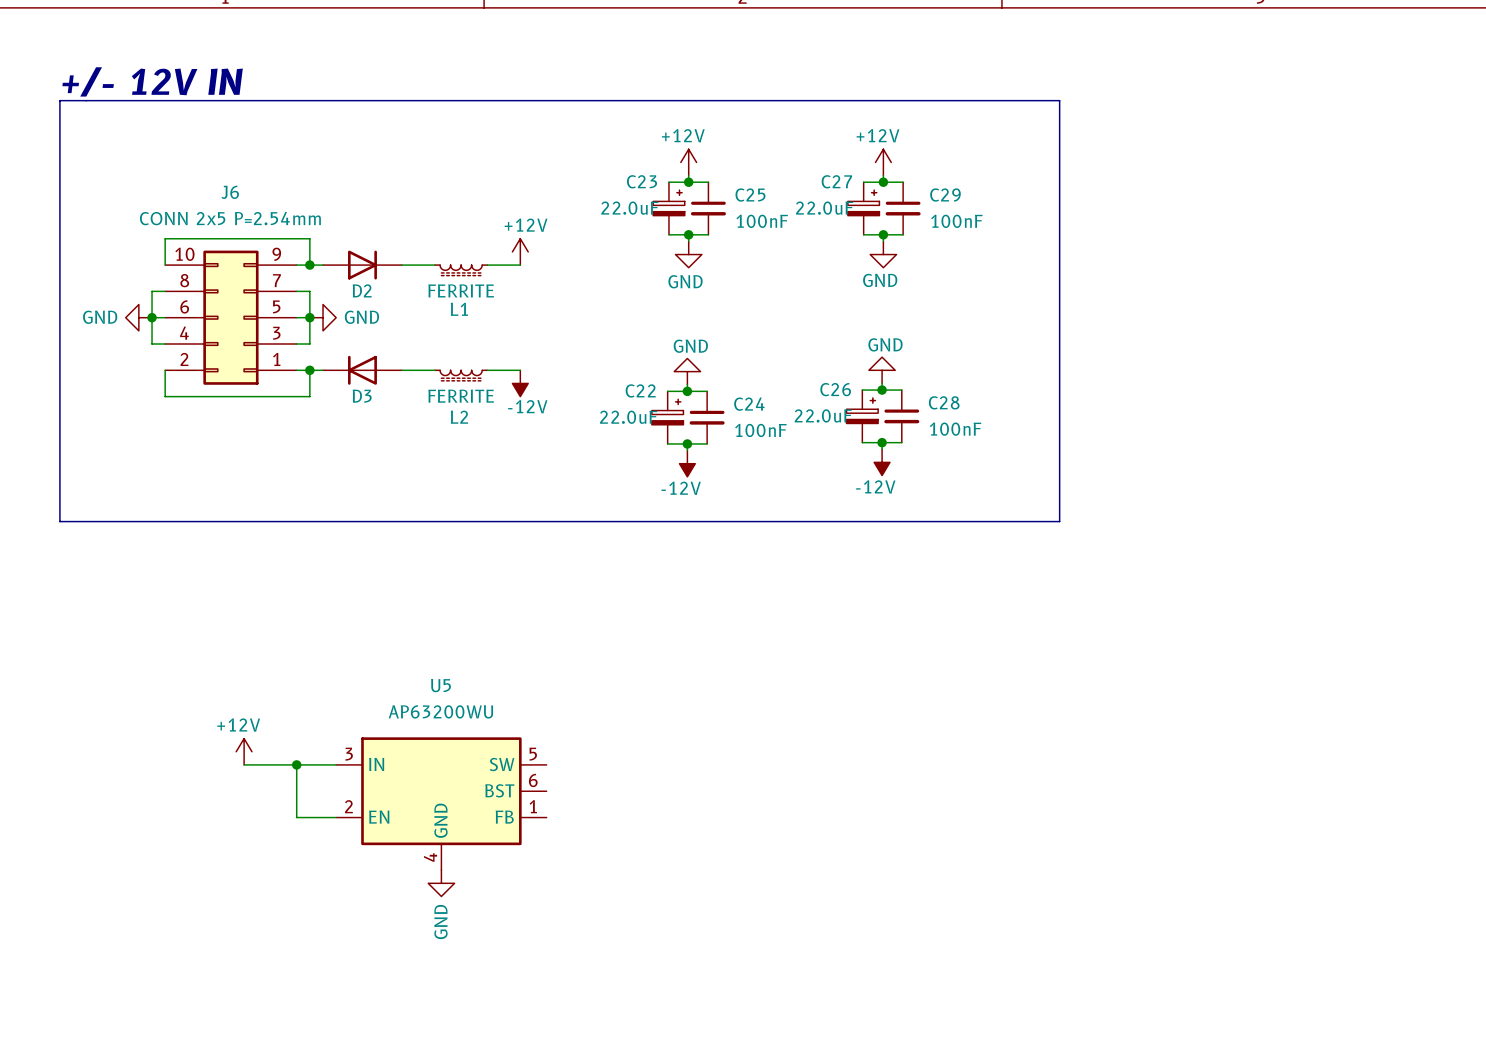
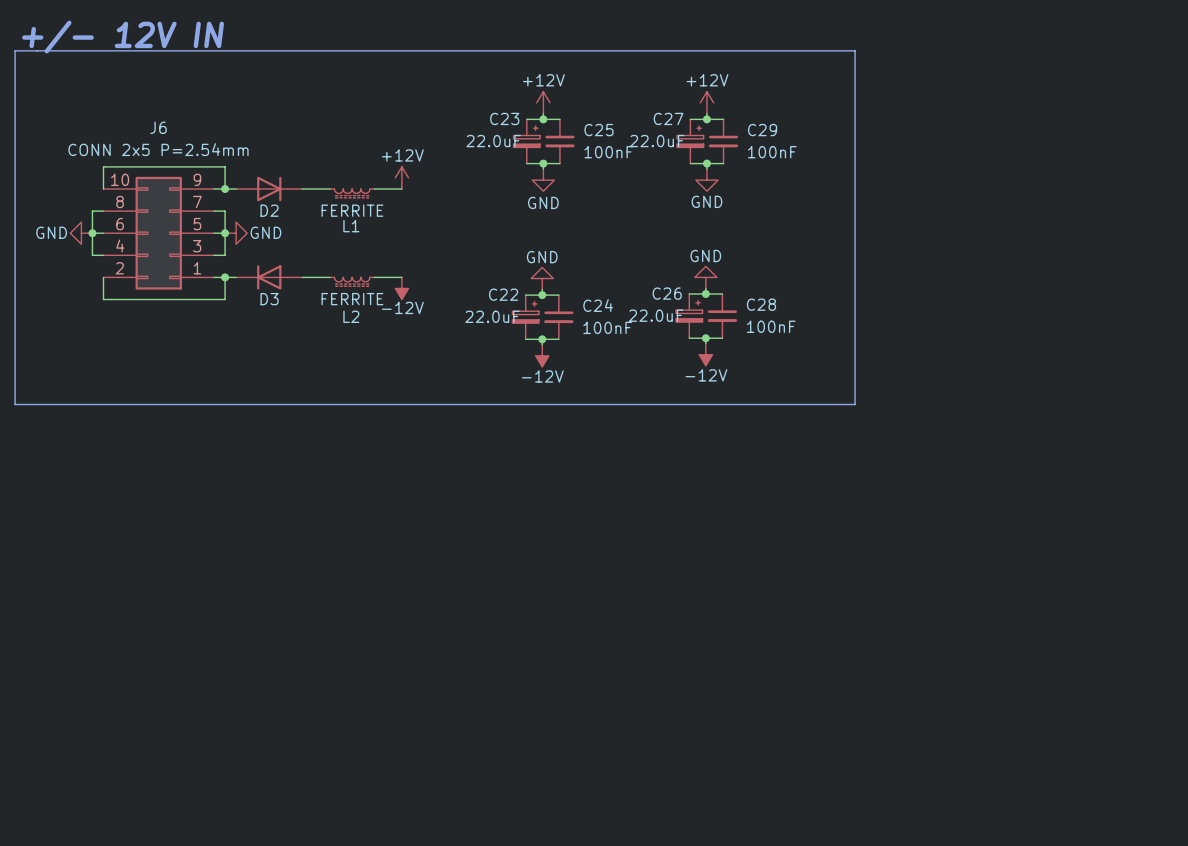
power symbol: +12V (244, 751) -> none
wire: (244, 764) (336, 764) -> none
wire: (296, 764) (296, 817) (336, 817) -> none
junction: (296, 764) -> none
U5: AP63200WU (441, 803) -> none
power symbol: GND (441, 883) -> none

